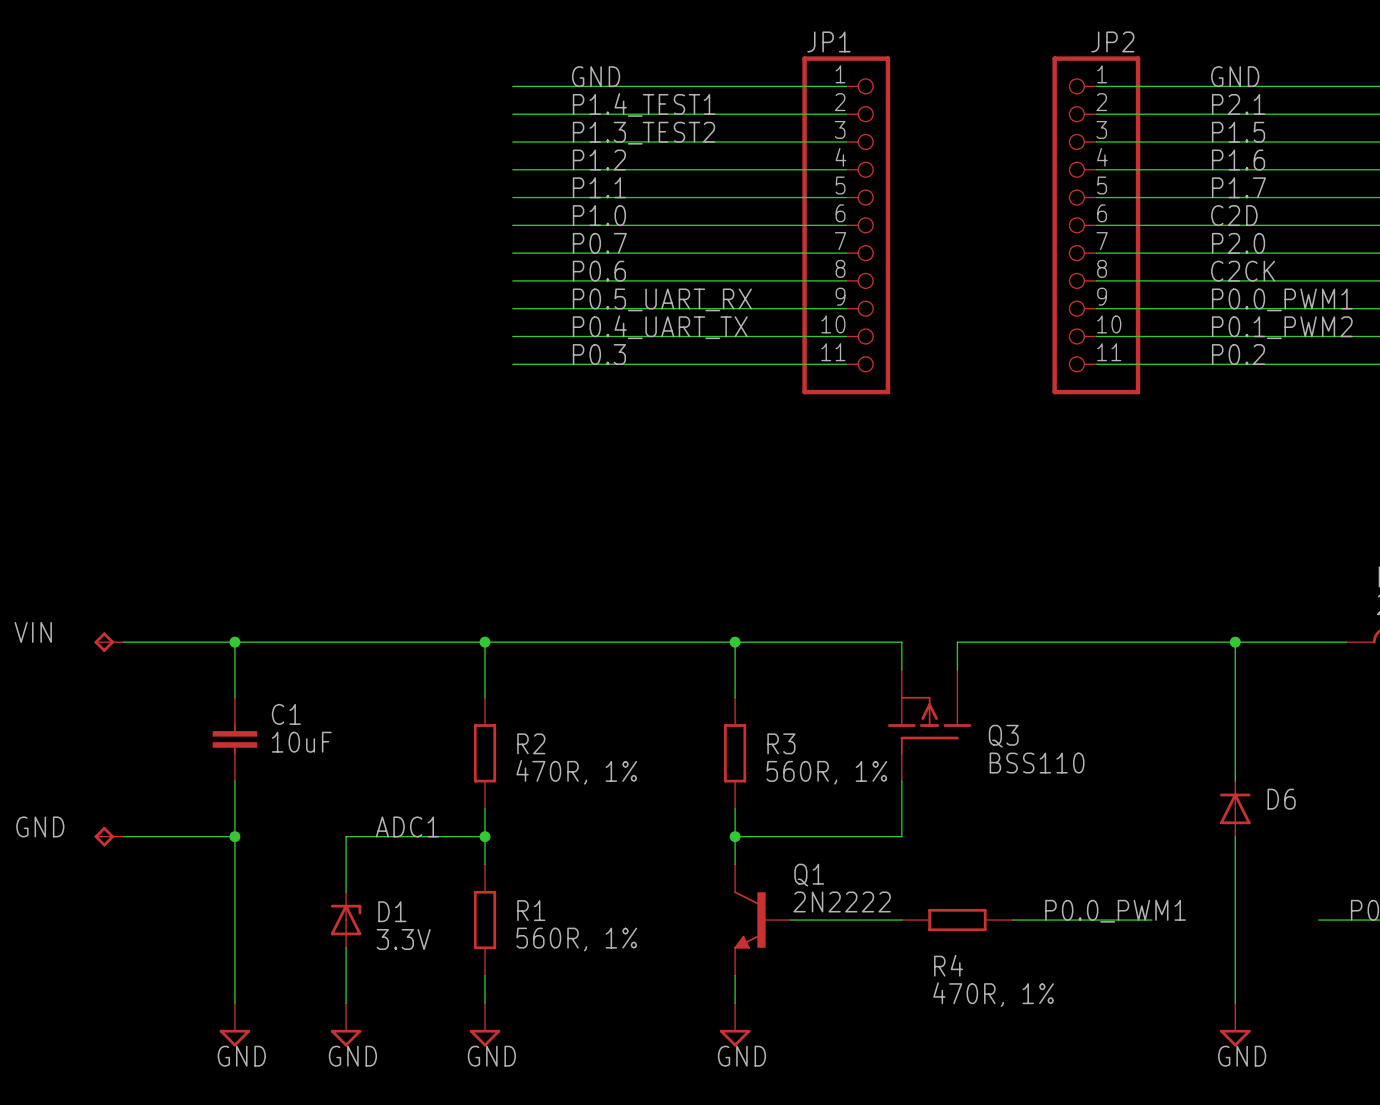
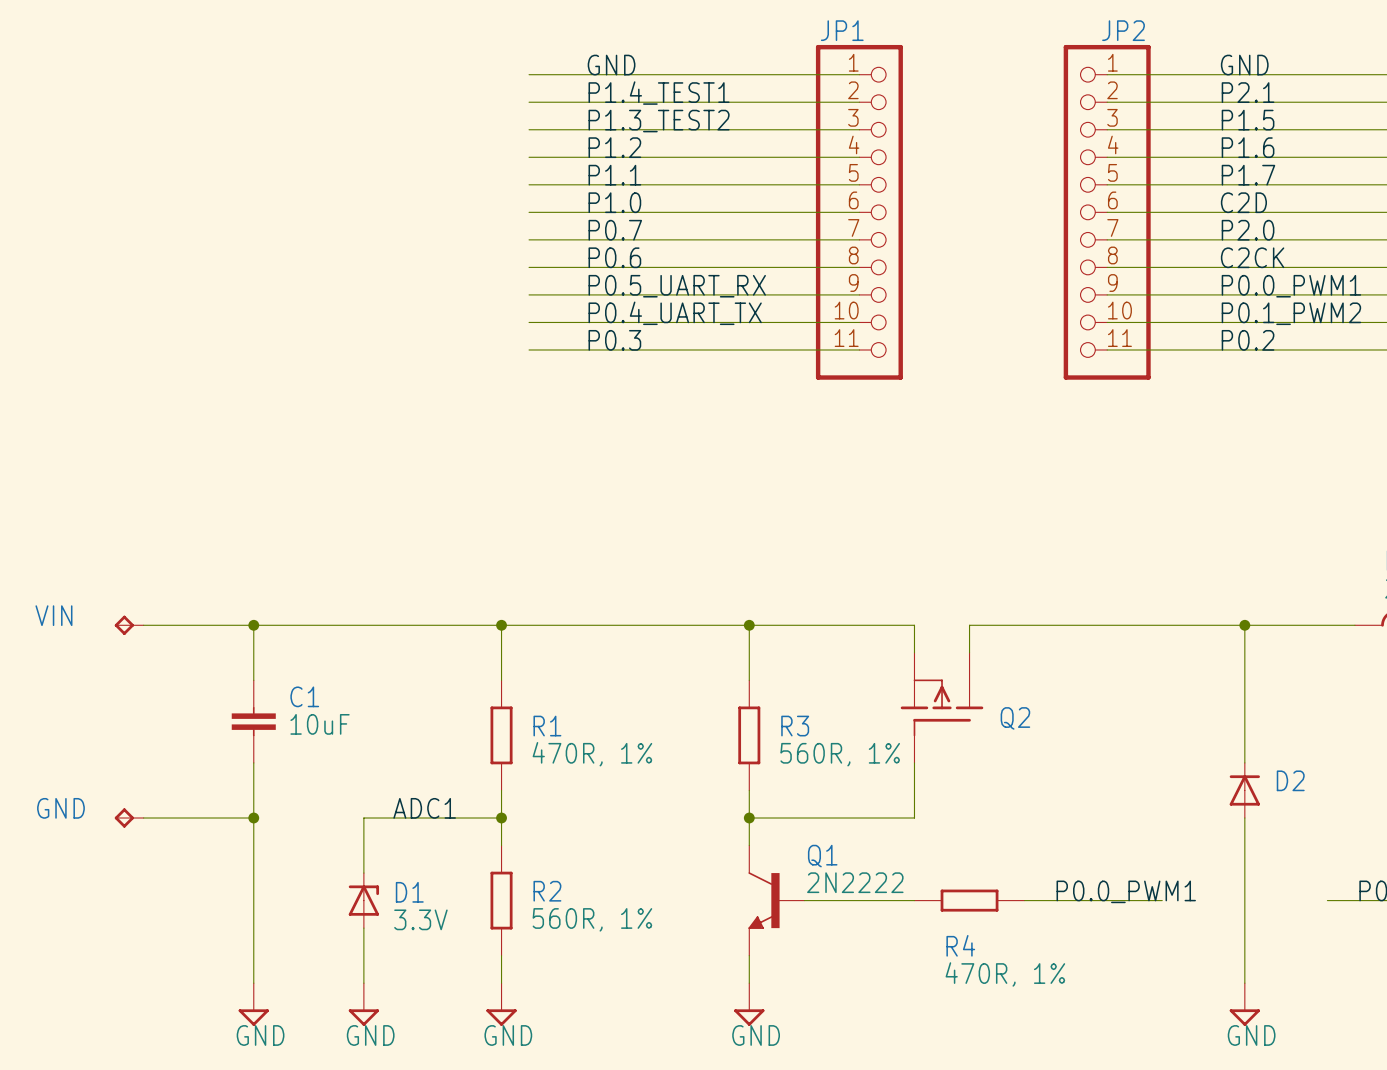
Q3 name: Q3 (1003, 736) -> Q2 (1015, 718)
R2 name: R2 (531, 743) -> R1 (547, 726)
Q3 value: BSS110 (1037, 763) -> none
D6 name: D6 (1281, 799) -> D2 (1290, 780)
R1 name: R1 (531, 910) -> R2 (547, 891)

